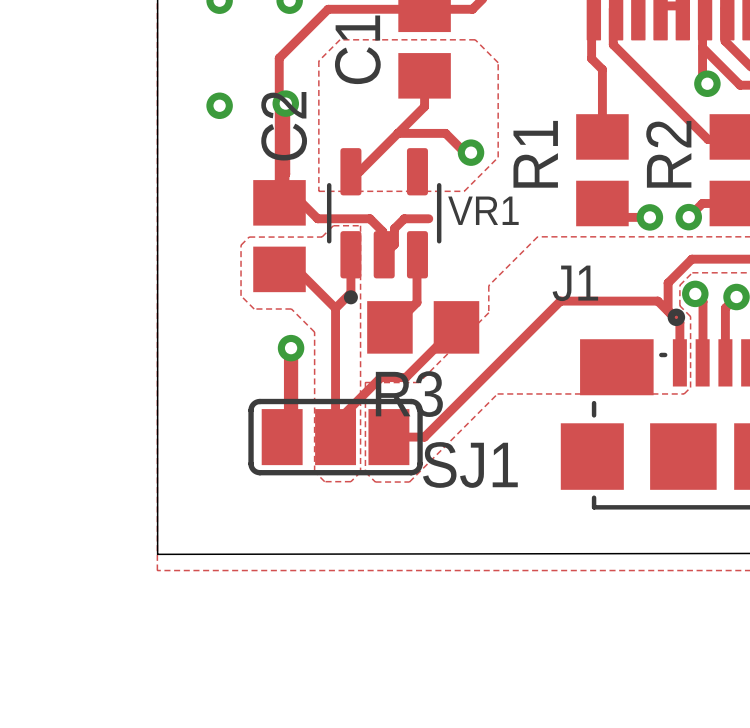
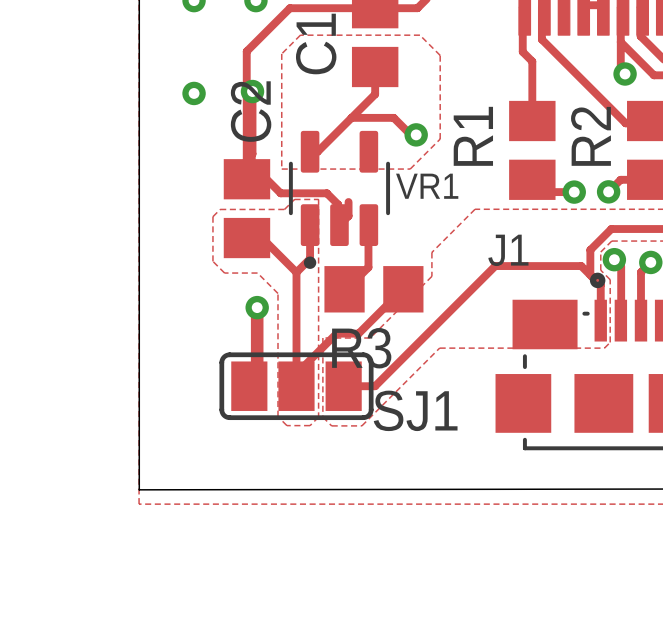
track: (428, 218) (404, 218) (394, 228) -> none

